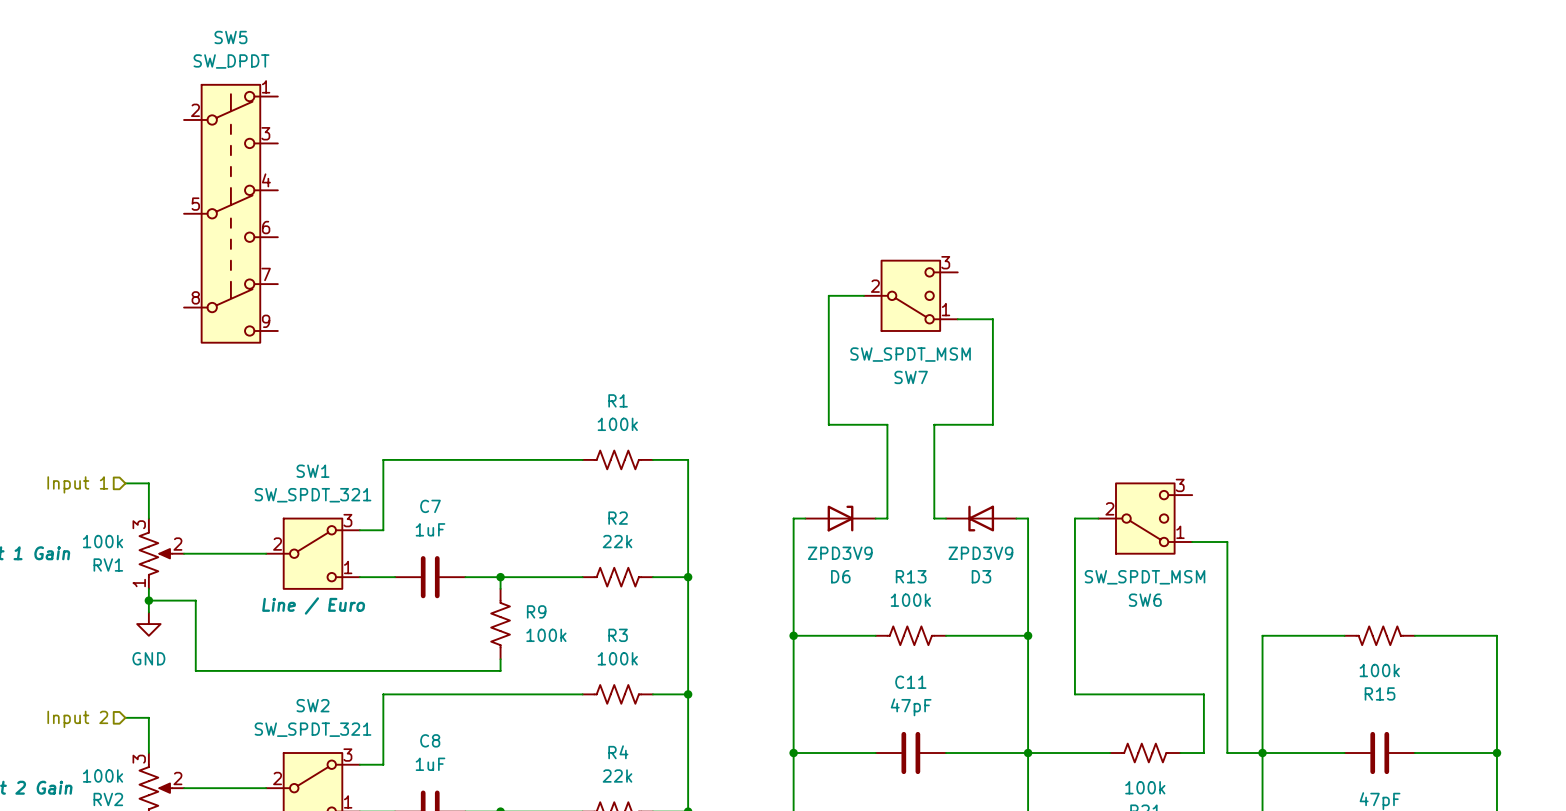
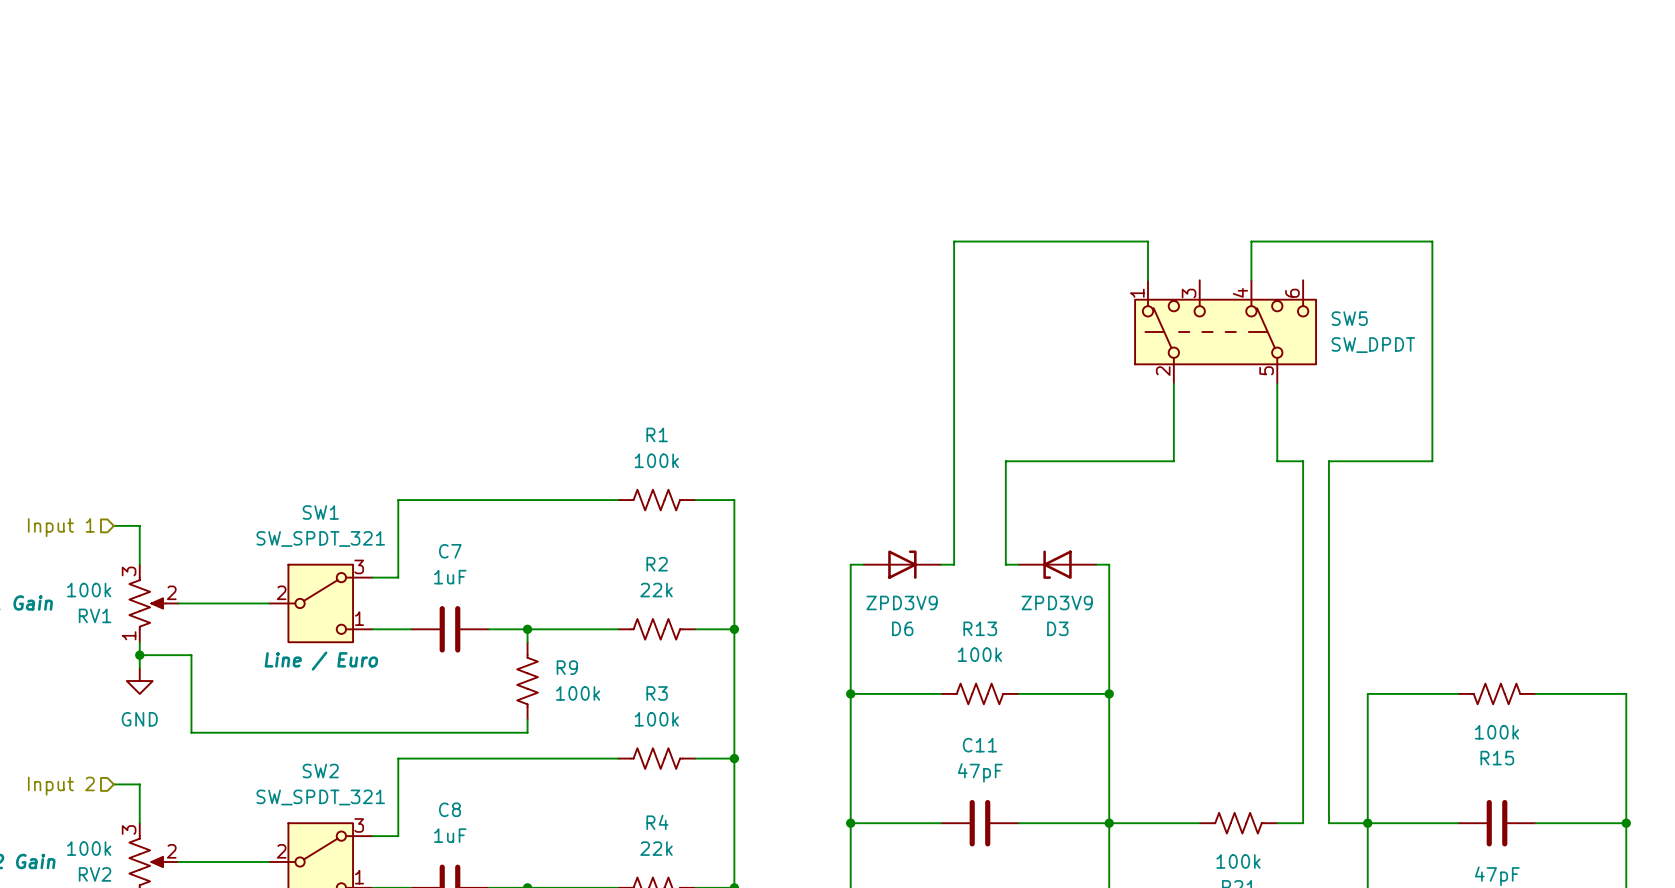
SW5 name position: SW5 (230, 37) -> SW5 (1349, 318)
SW5 value position: SW_DPDT (231, 61) -> SW_DPDT (1373, 345)
SW5 symbol: [184, 84, 278, 343] -> [1135, 280, 1317, 384]
wire: (863, 295) (828, 295) (828, 424) (887, 424) -> (1148, 280) (1148, 241) (954, 241) (954, 461)
SW7: SW_SPDT_MSM (910, 295) -> none
wire: (957, 319) (992, 319) (992, 424) -> (1173, 383) (1173, 461) (1070, 461)
wire: (1098, 518) (1074, 518) (1074, 694) (1203, 694) -> (1277, 383) (1277, 461) (1303, 461) (1303, 758)
SW6: SW_SPDT_MSM (1145, 518) -> none
wire: (1192, 542) (1227, 542) -> (1251, 280) (1251, 241) (1432, 241) (1432, 461) (1328, 461) (1328, 590)

